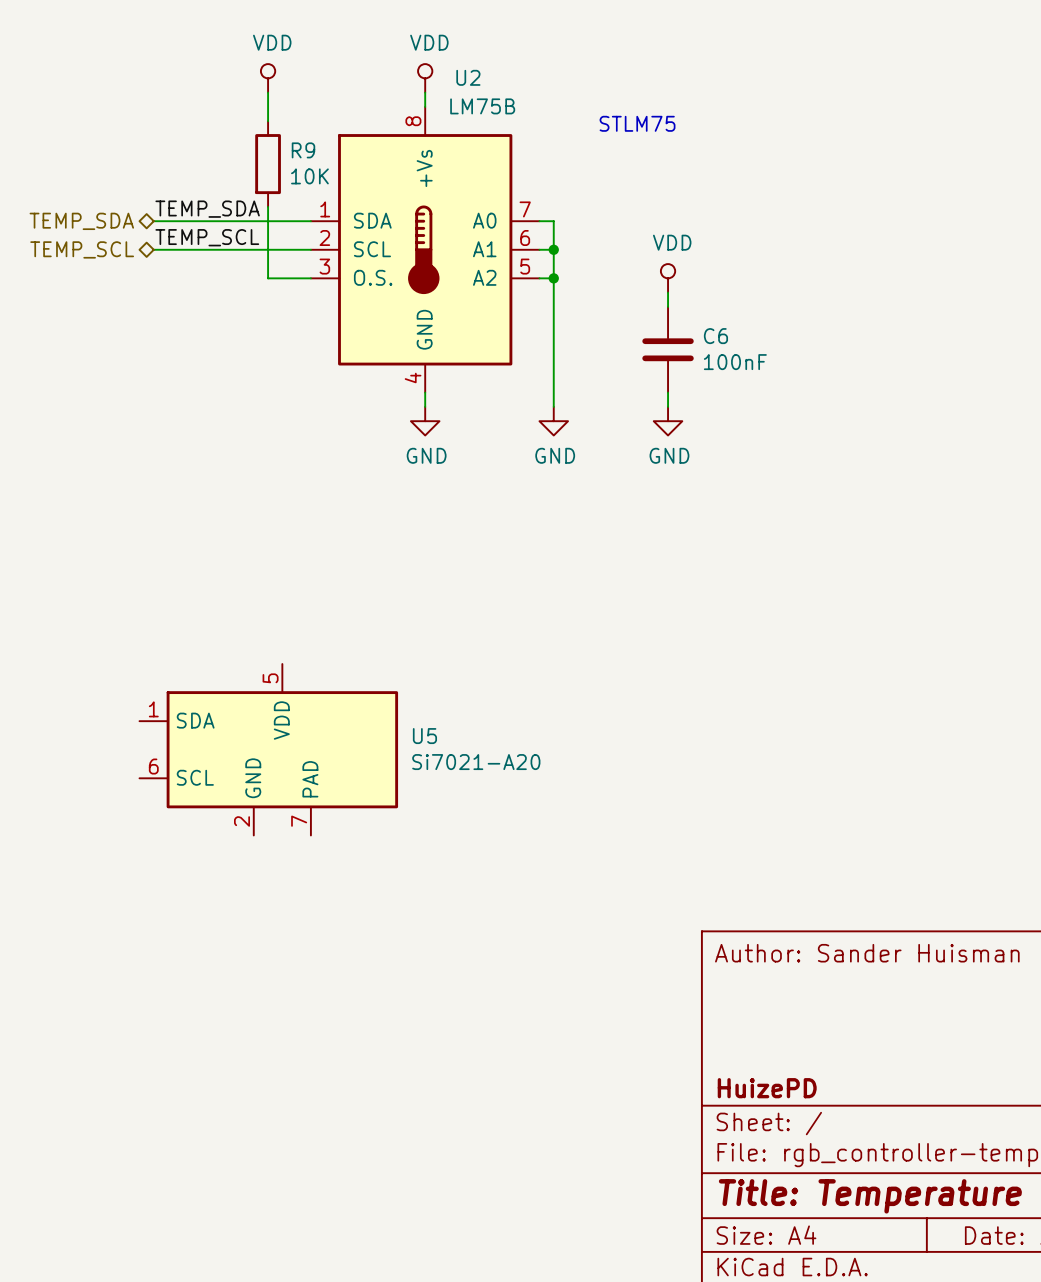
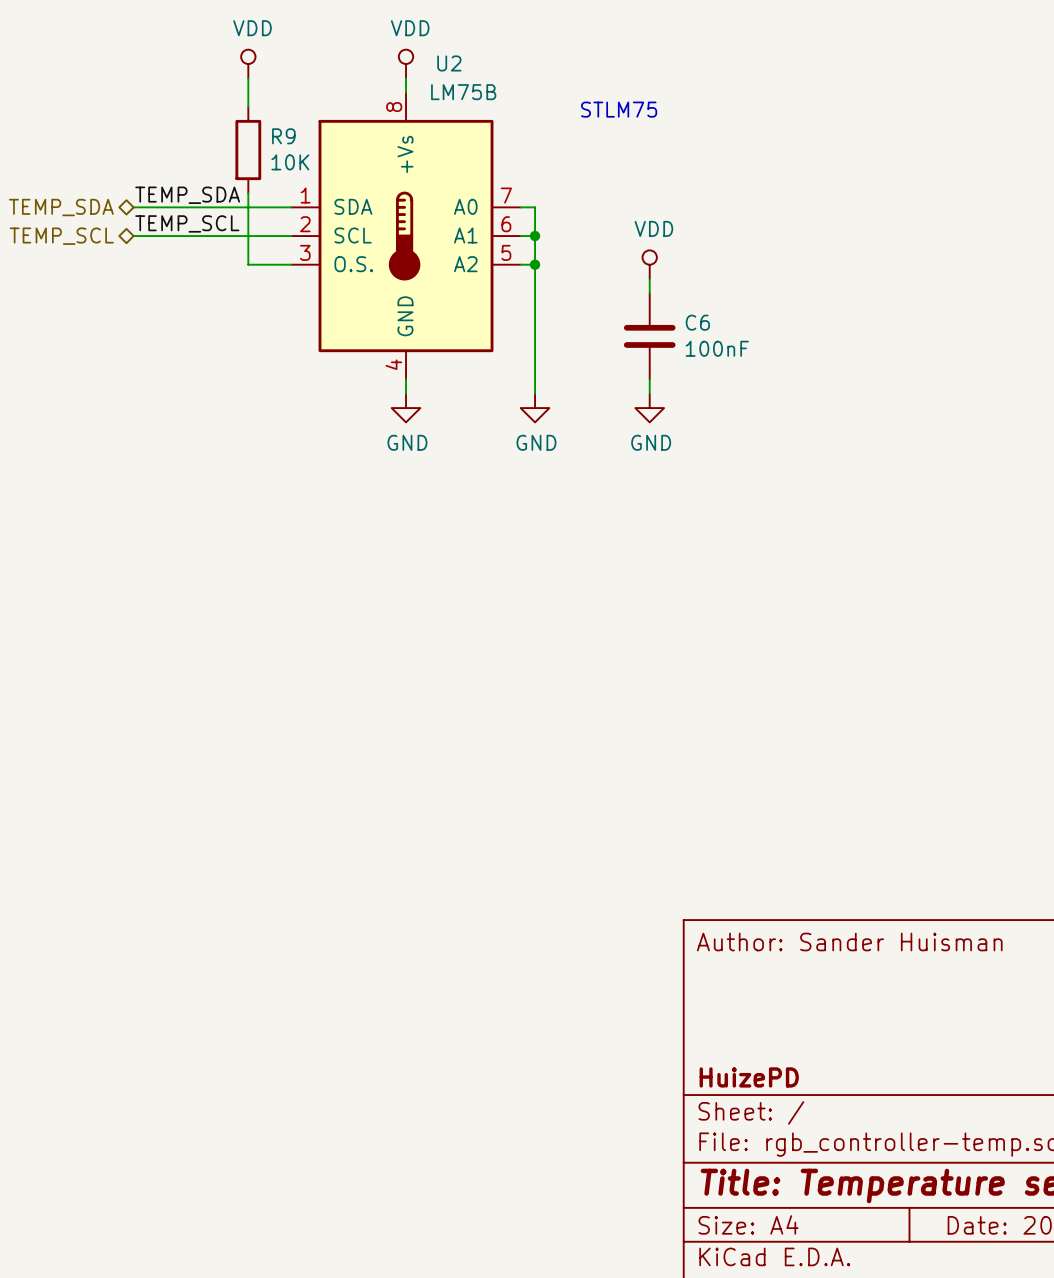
U5: Si7021-A20 (268, 749) -> none

